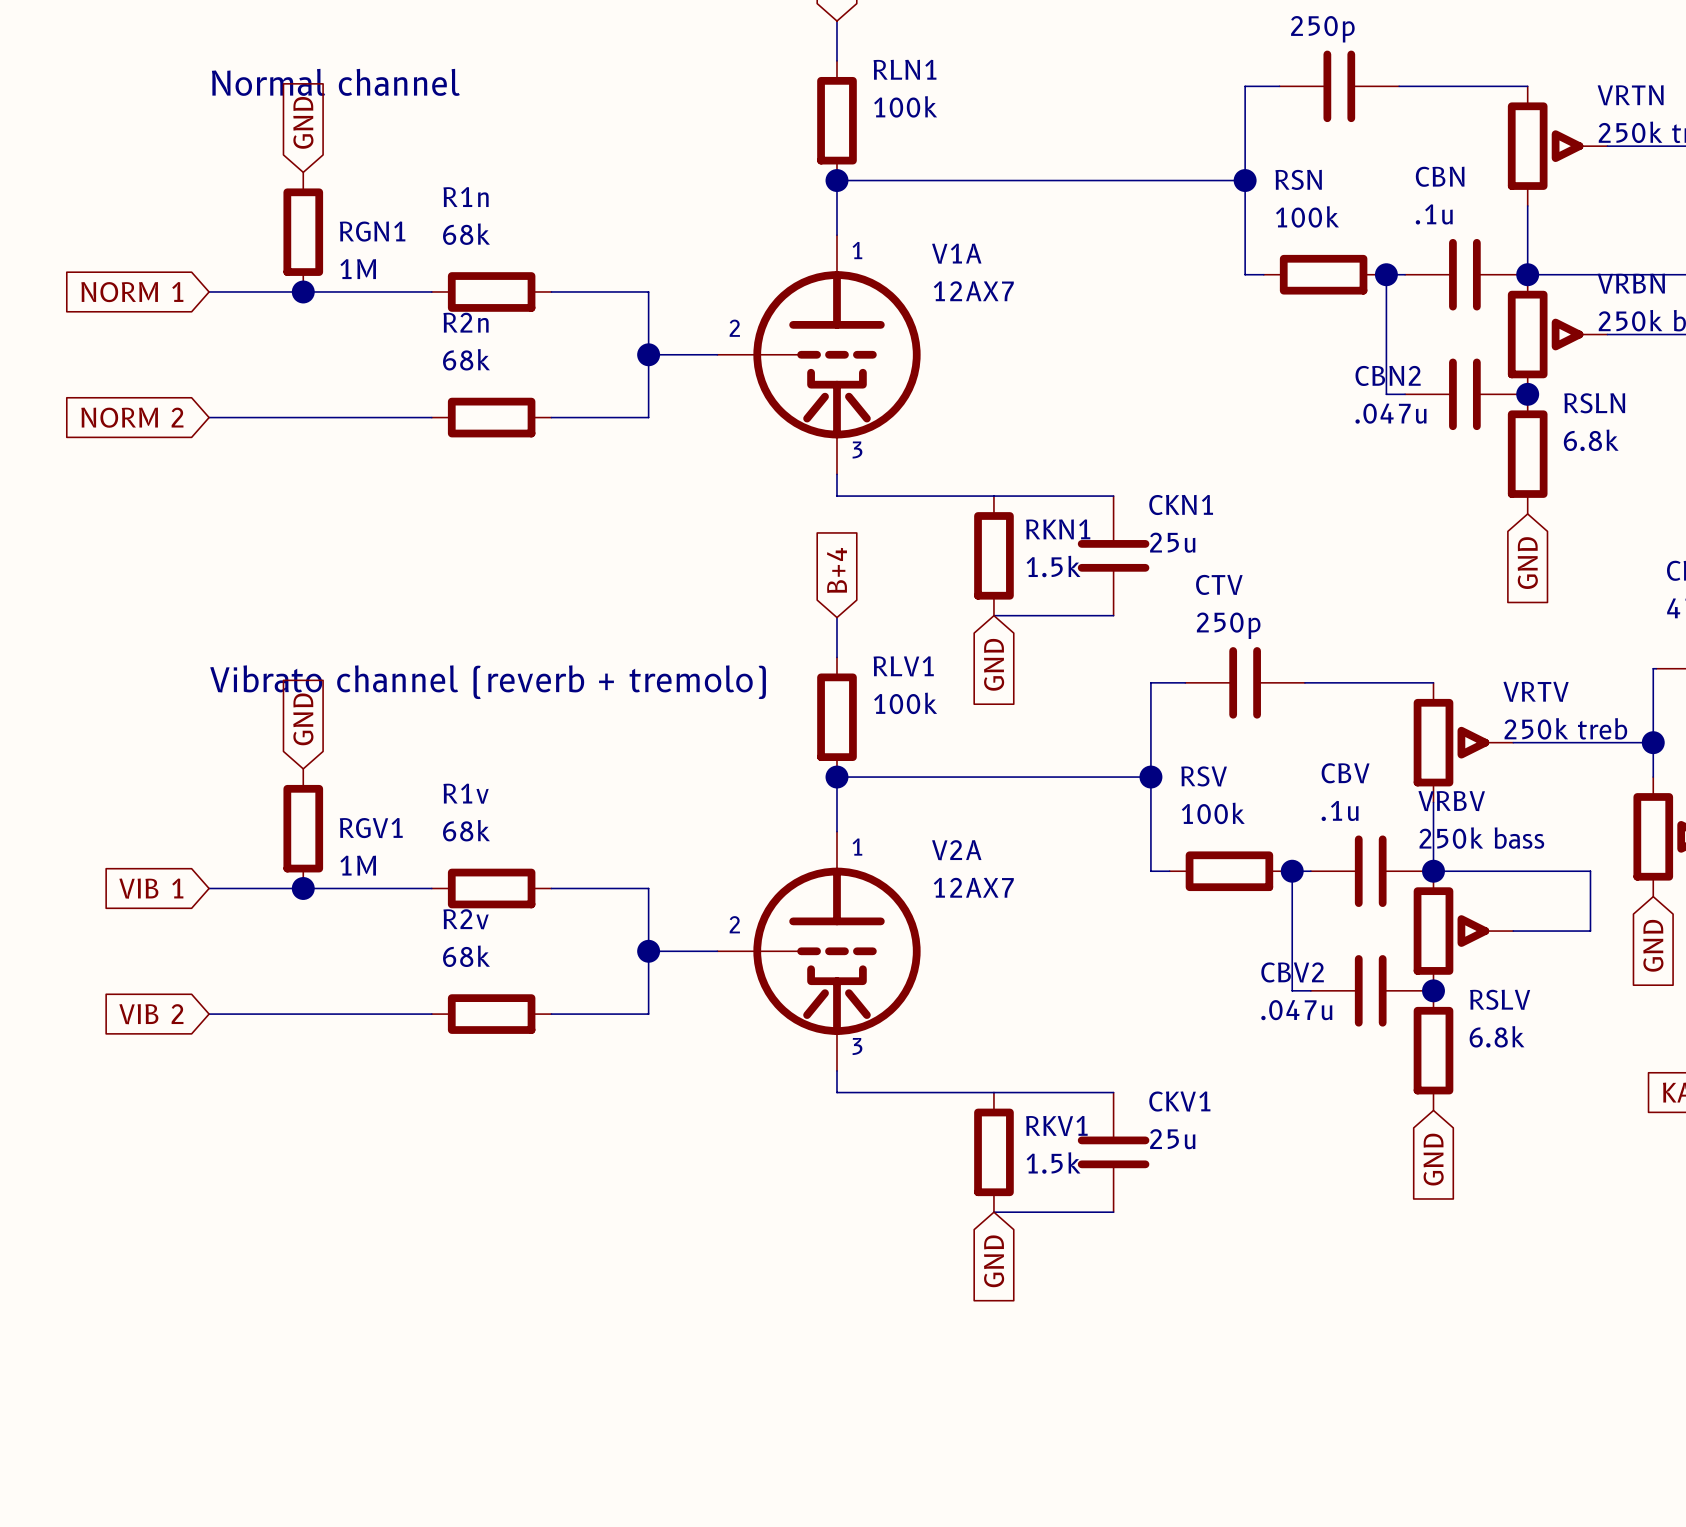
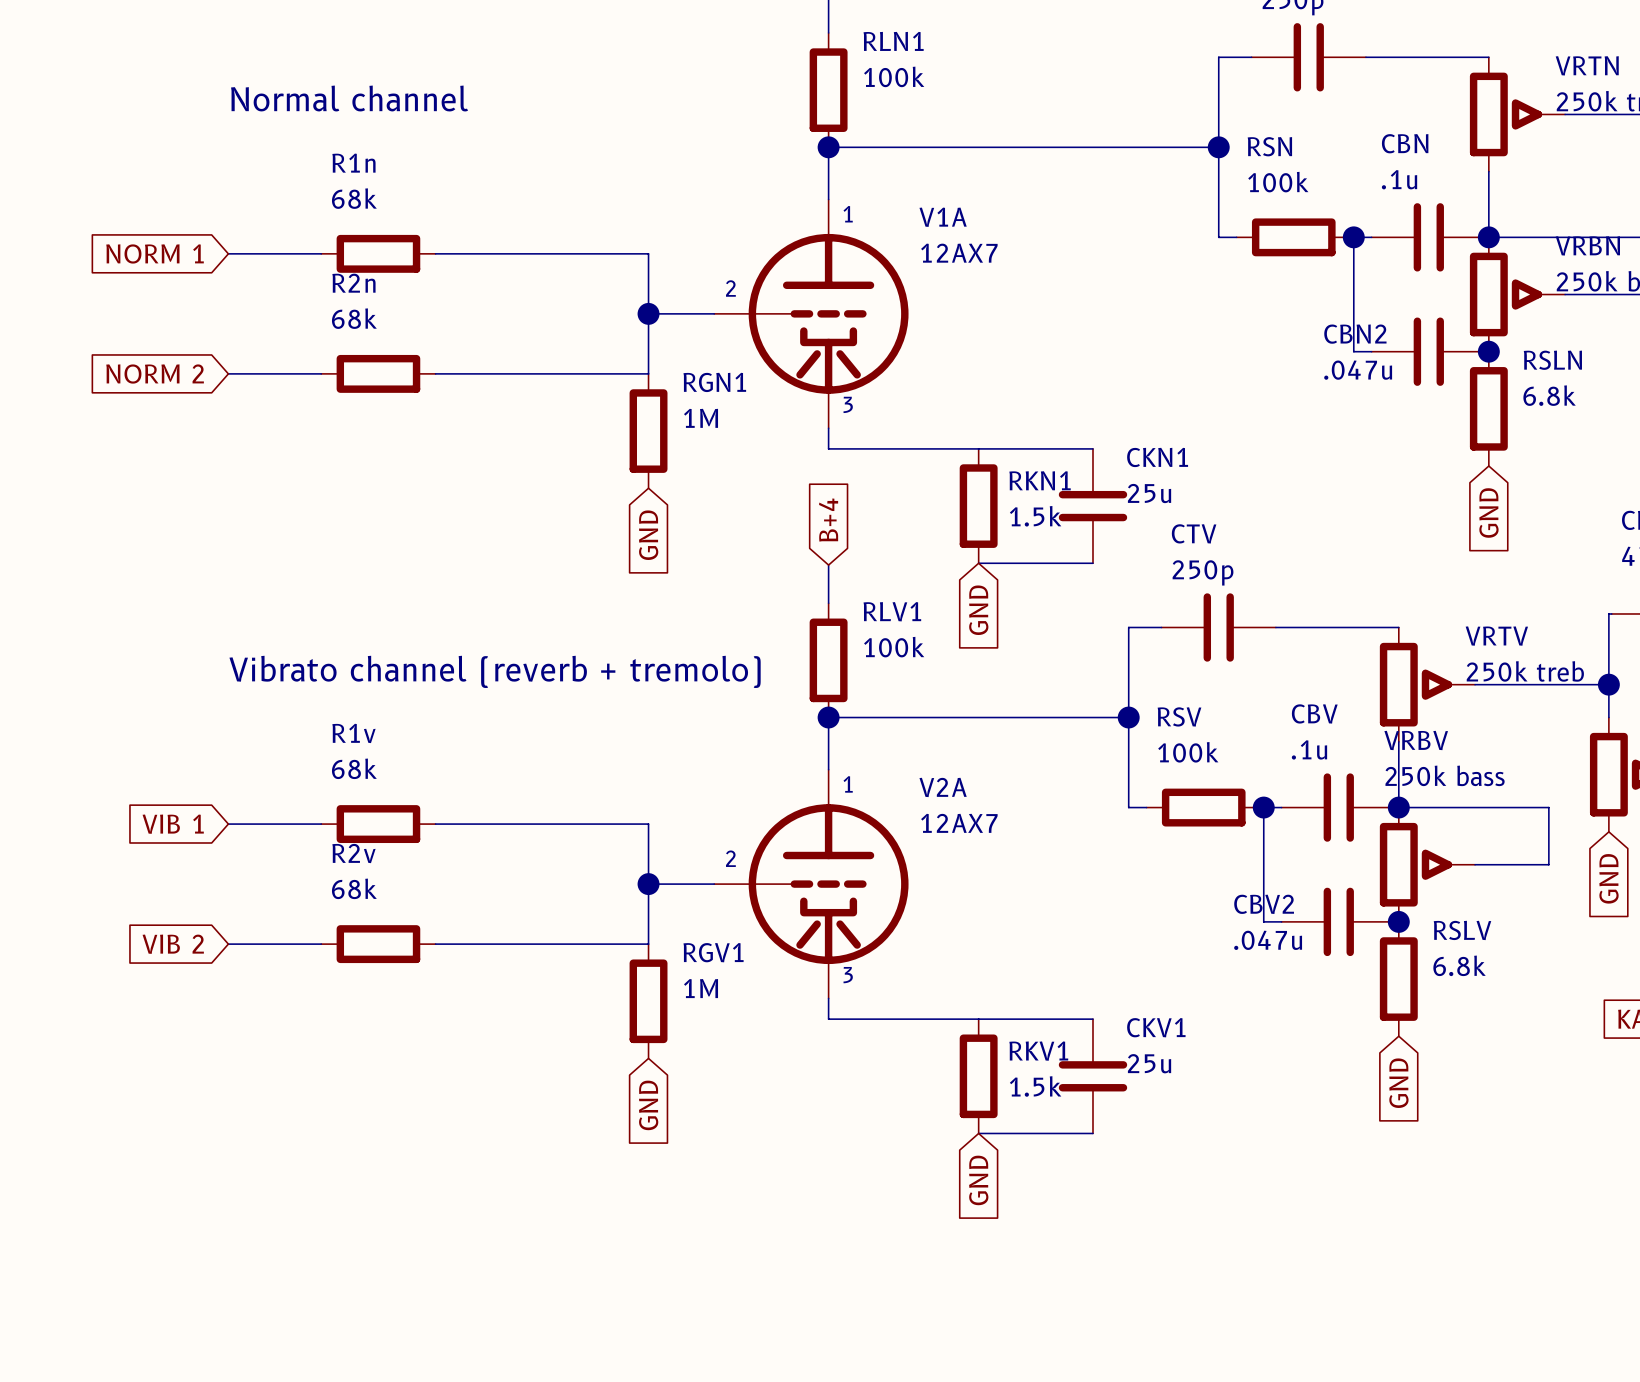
text position: Normal channel (335, 82) -> Normal channel (349, 98)
global label: GND (303, 122) -> none
RGN1 name position: RGN1 (372, 231) -> RGN1 (714, 382)
RGN1 position: (303, 232) -> (648, 431)
RGN1 value position: 1M (358, 269) -> 1M (701, 418)
junction: (303, 291) -> none
wire: (306, 291) (425, 291) -> (441, 253) (555, 253)
R1n position: (491, 291) -> (378, 253)
wire: (306, 417) (425, 417) -> (441, 373) (555, 373)
R2n position: (491, 417) -> (378, 373)
global label: none -> GND (648, 535)
text position: Vibrato channel (reverb + tremolo) (488, 682) -> Vibrato channel (reverb + tremolo) (495, 671)
global label: GND (303, 719) -> none
RGV1 position: (303, 828) -> (648, 1001)
RGV1 name position: RGV1 (371, 828) -> RGV1 (713, 952)
RGV1 value position: 1M (358, 865) -> 1M (701, 988)
junction: (303, 888) -> none
wire: (306, 888) (425, 888) -> (441, 824) (555, 824)
R1v position: (491, 888) -> (378, 824)
wire: (306, 1014) (425, 1014) -> (441, 944) (555, 944)
R2v position: (491, 1014) -> (378, 944)
global label: none -> GND (648, 1105)

